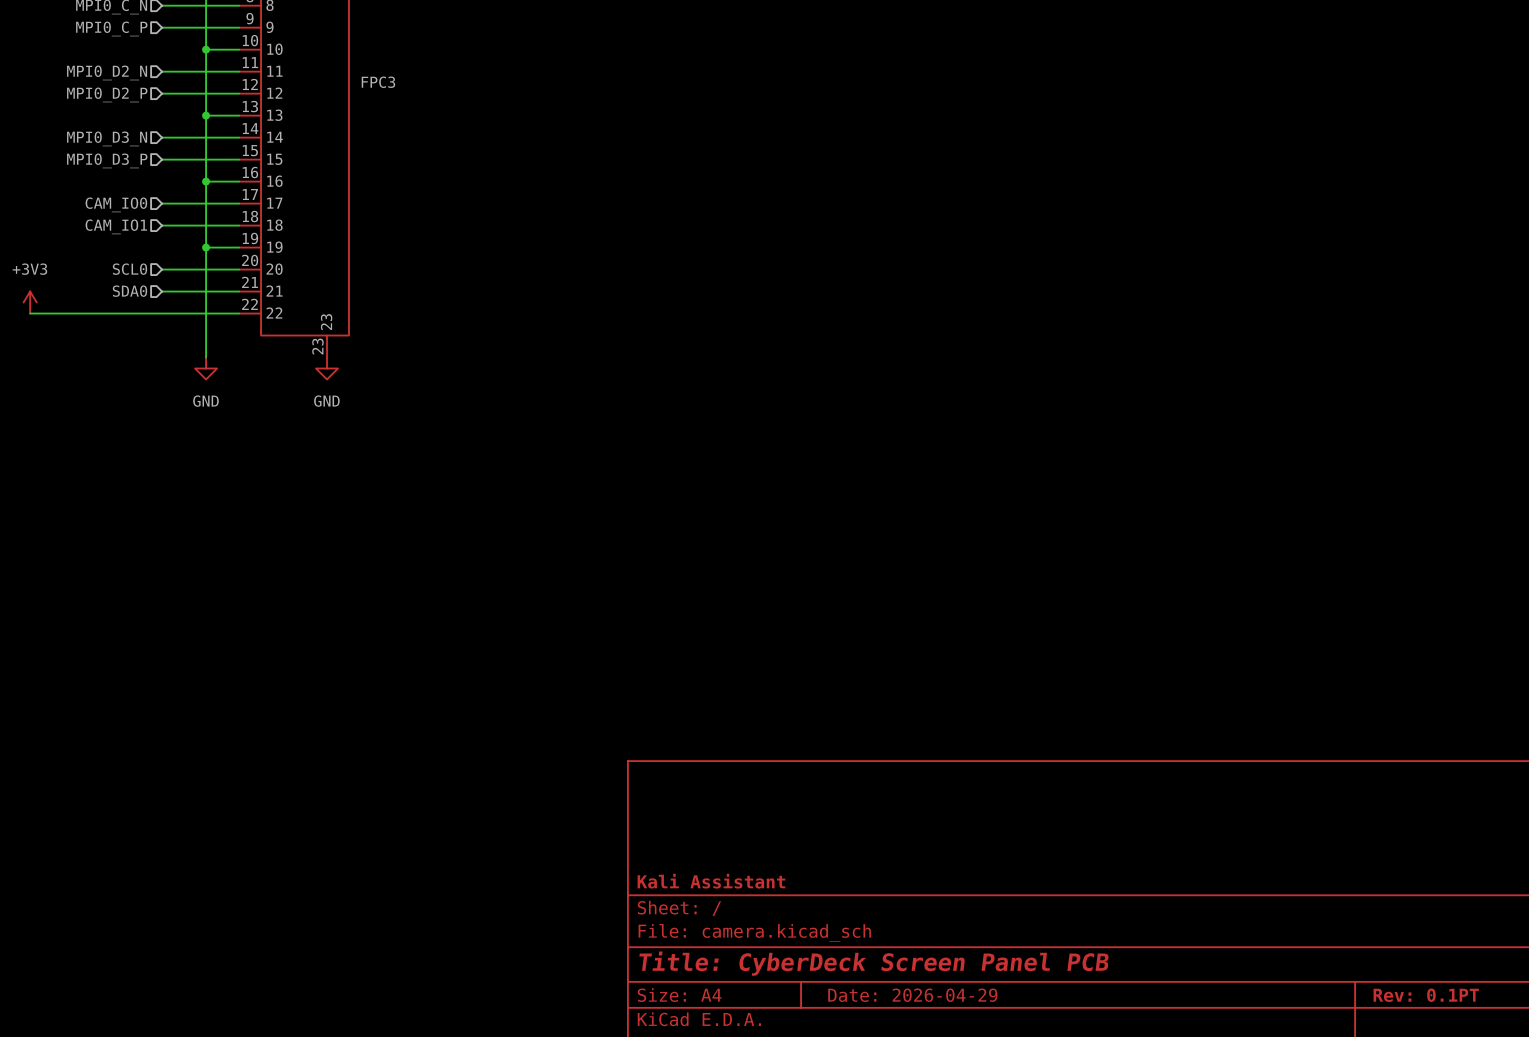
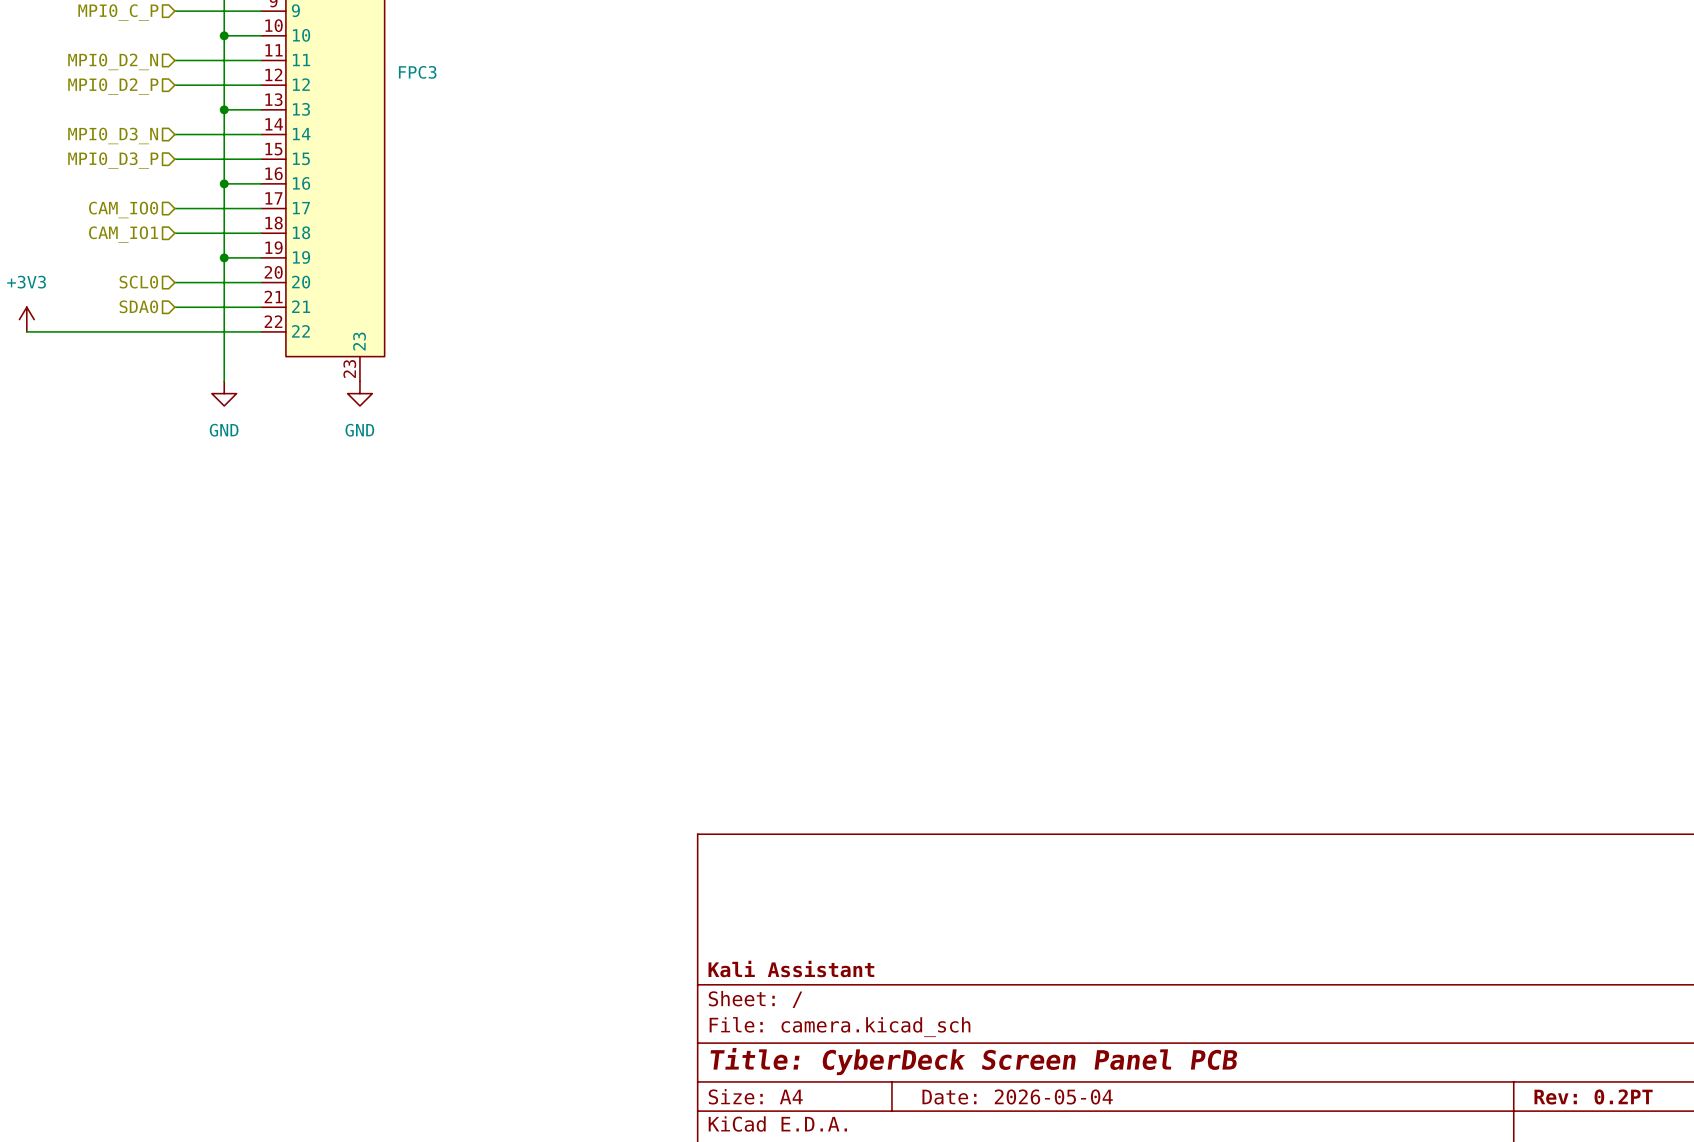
title block: Date: 2026-04-29 (912, 995) -> Date: 2026-05-04 (1017, 1096)
title block: Rev: 0.1PT (1426, 995) -> Rev: 0.2PT (1593, 1096)

